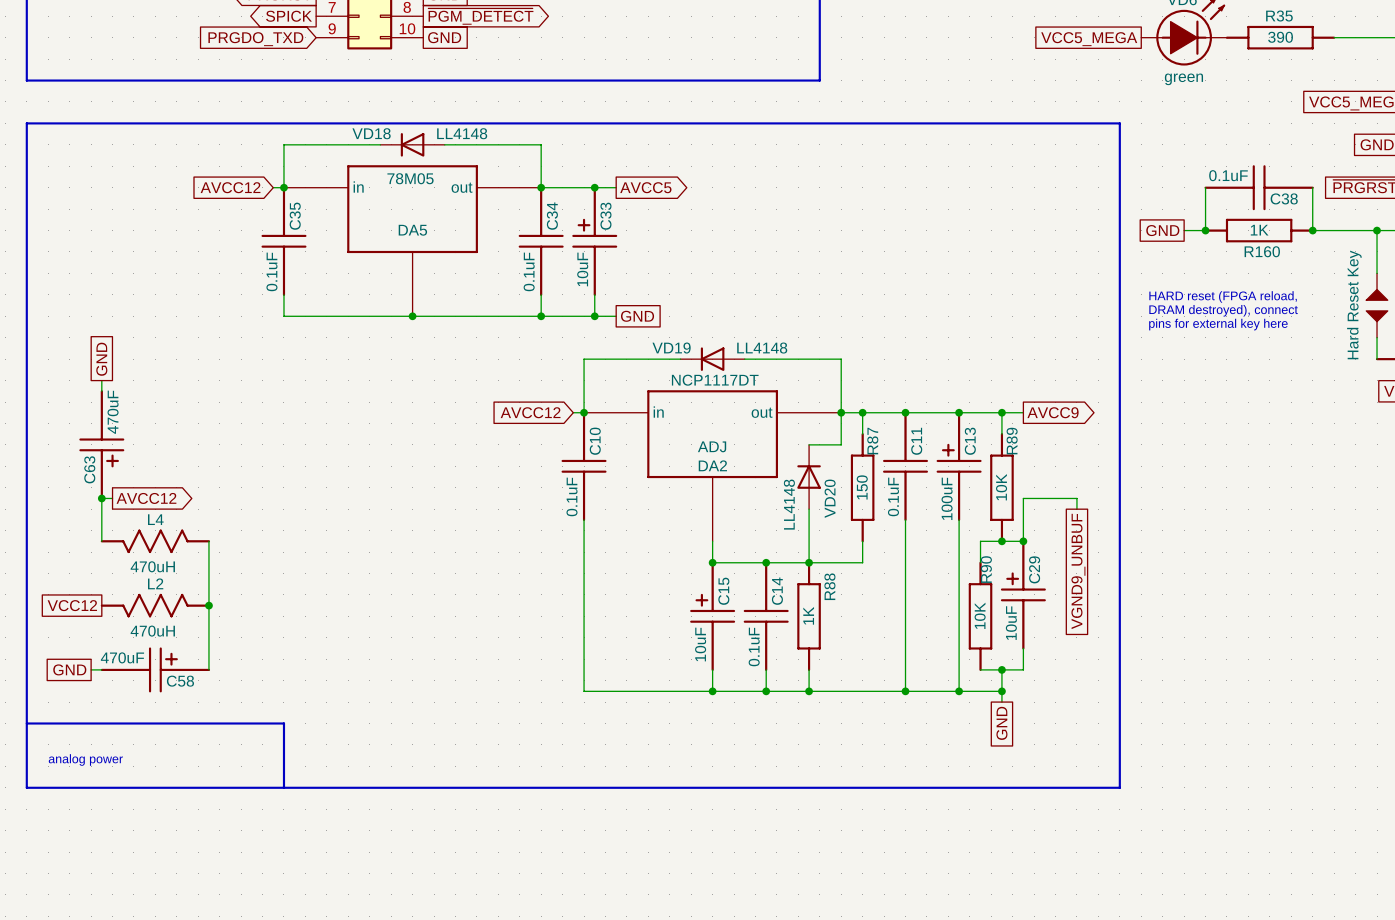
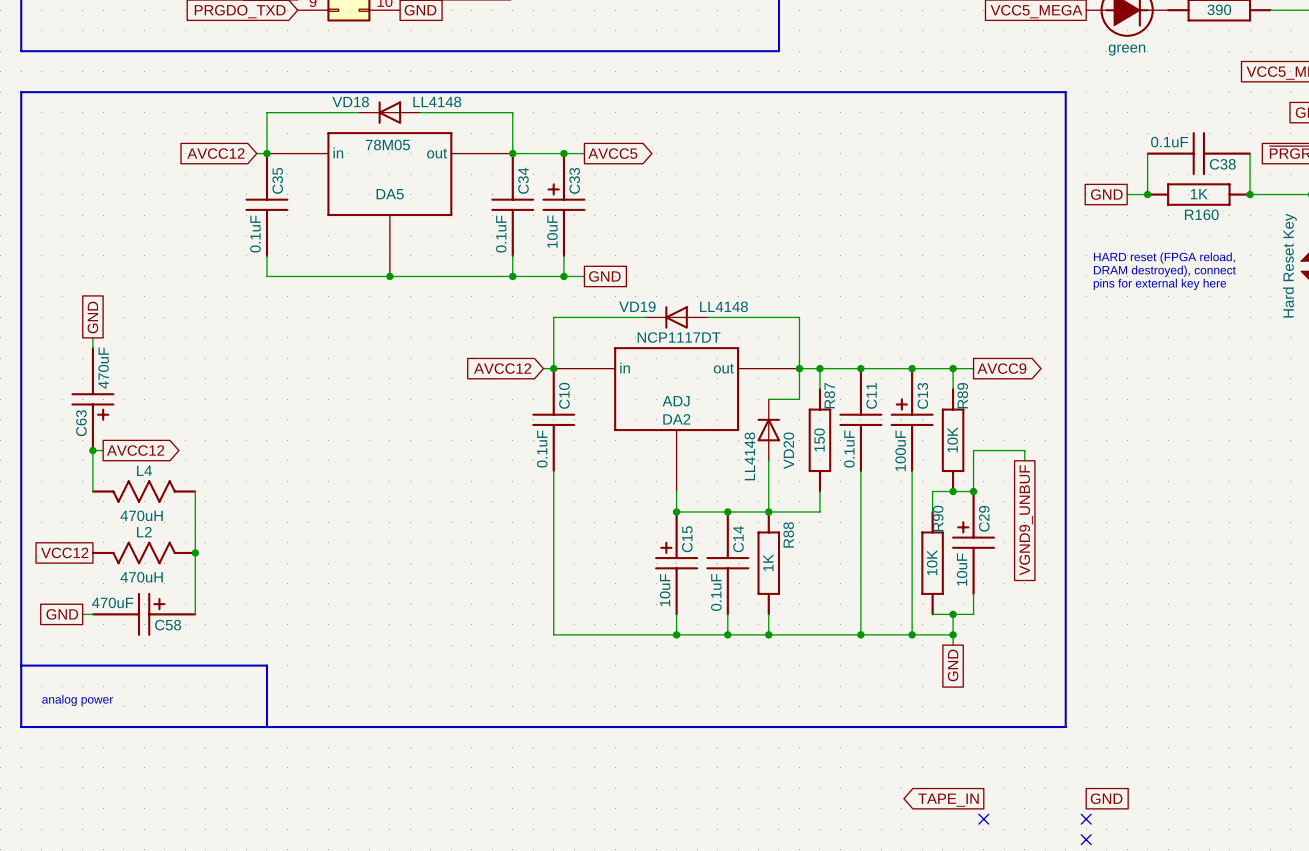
global label: none -> GND (1106, 798)
global label: none -> TAPE_IN (948, 800)
no-connect mark: none -> (983, 819)
no-connect mark: none -> (1086, 819)
no-connect mark: none -> (1086, 839)

